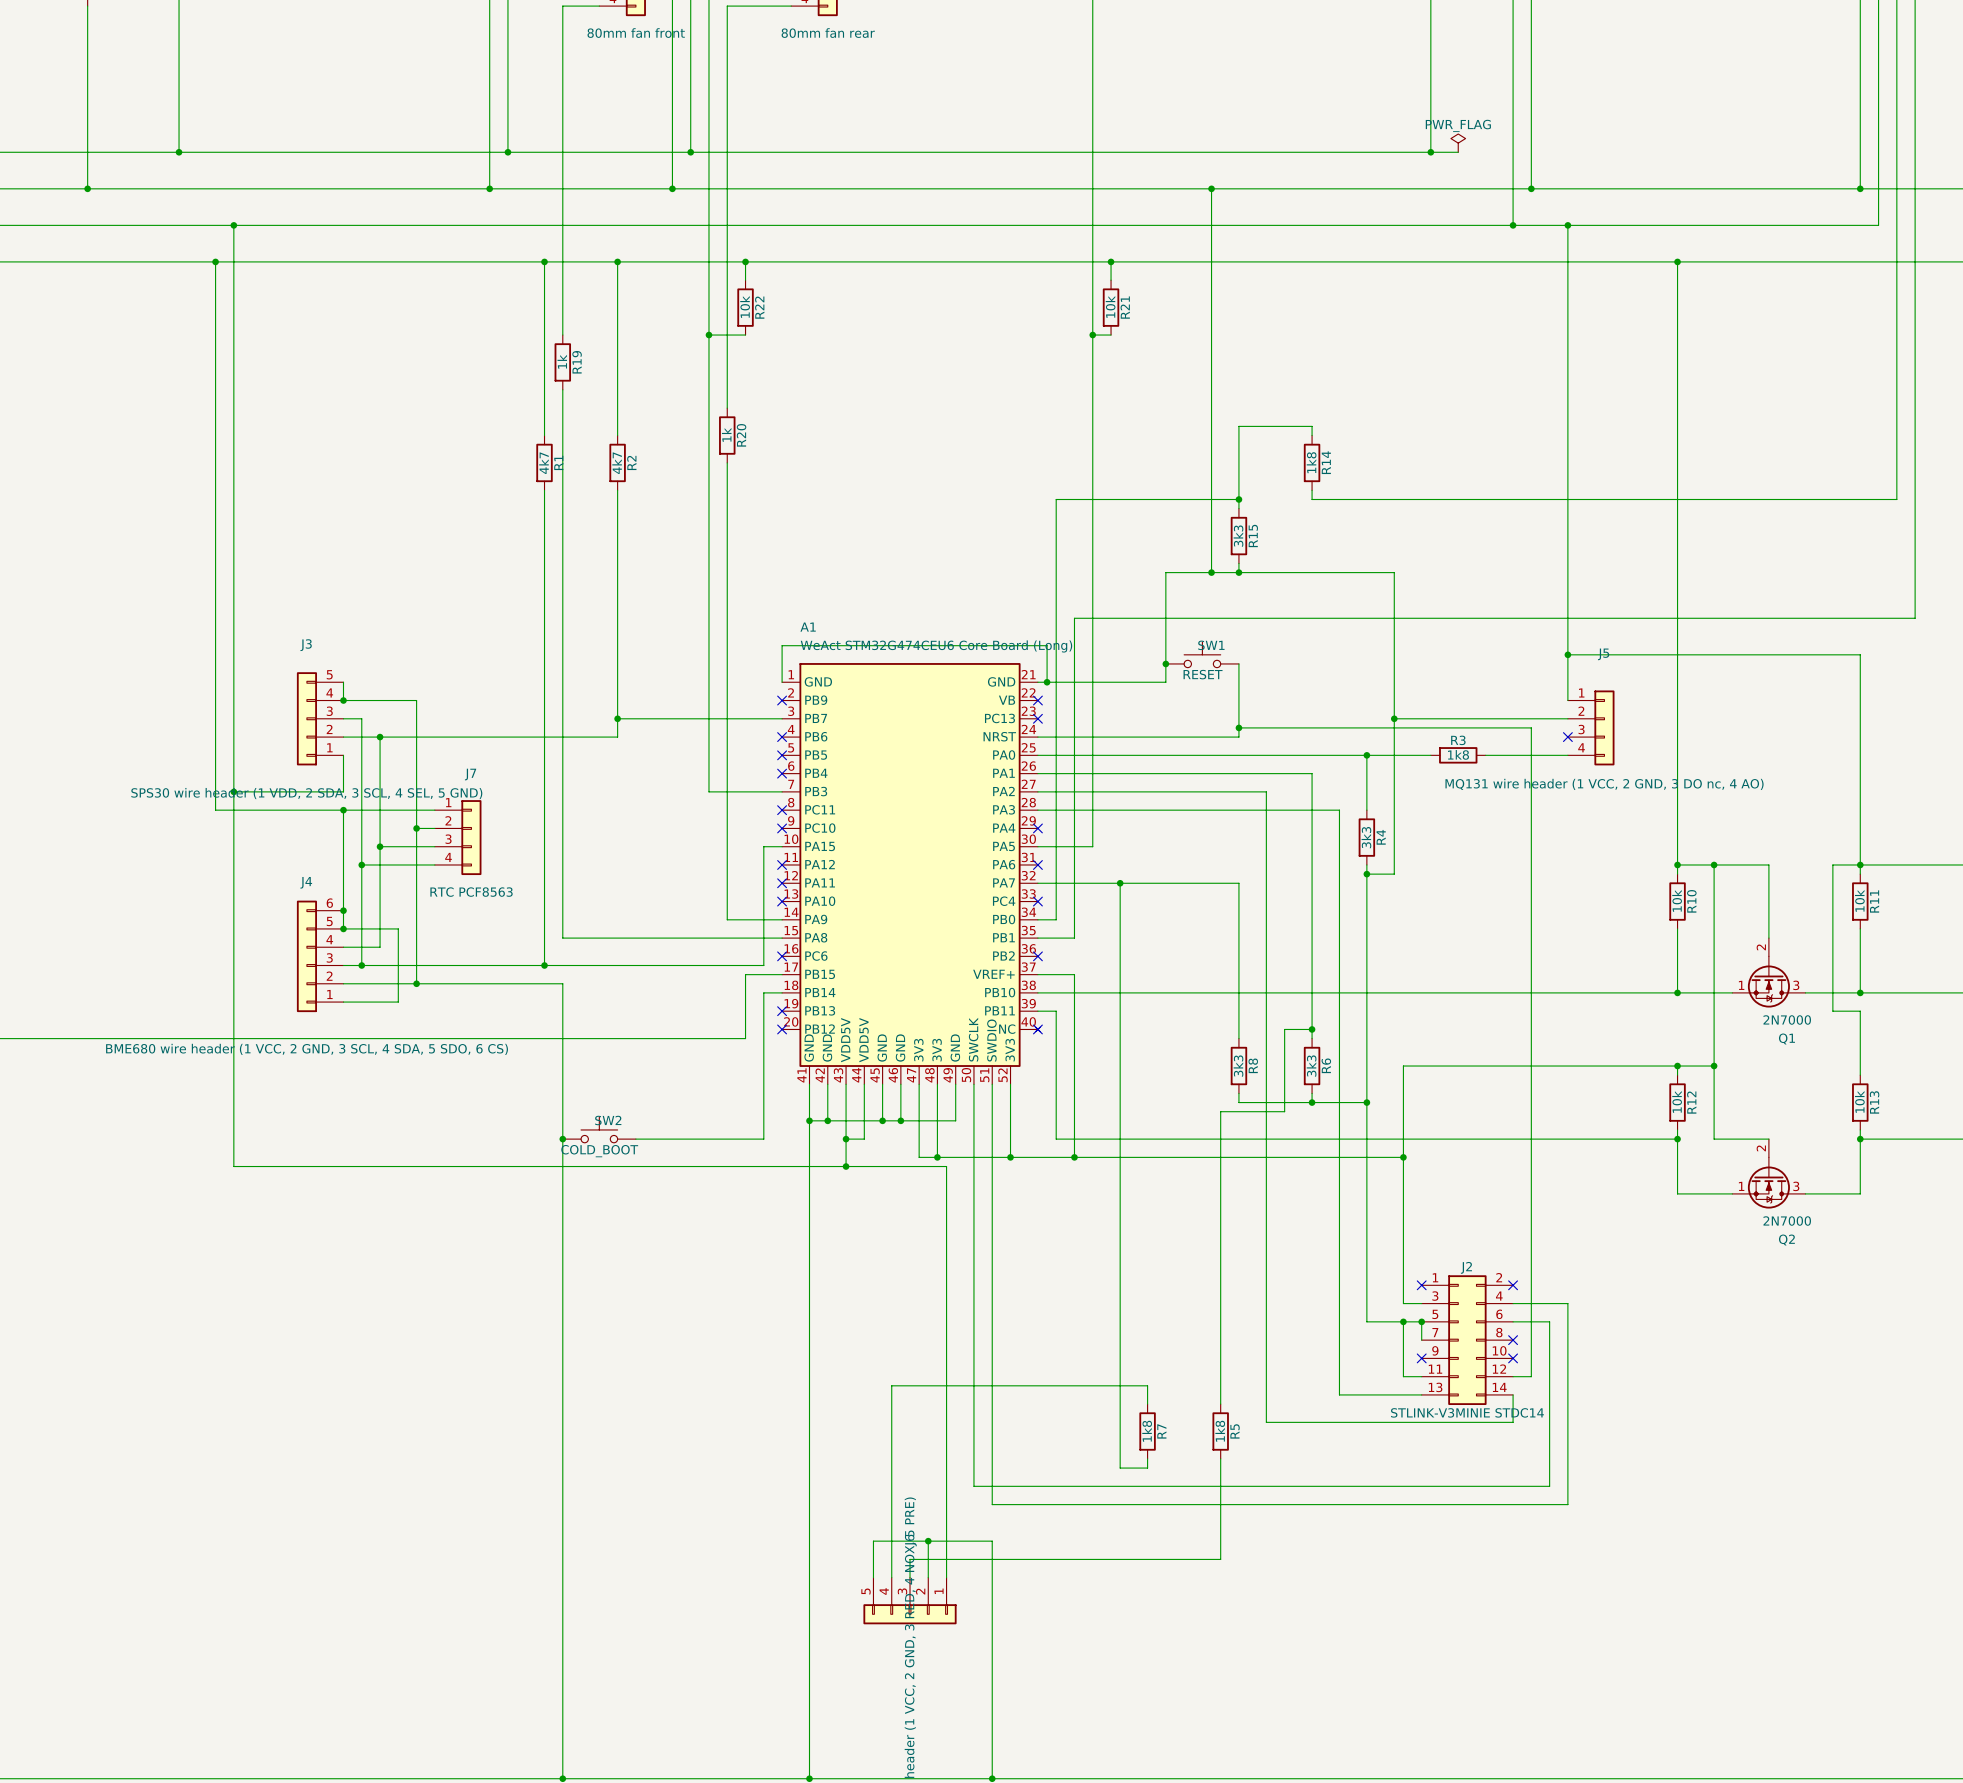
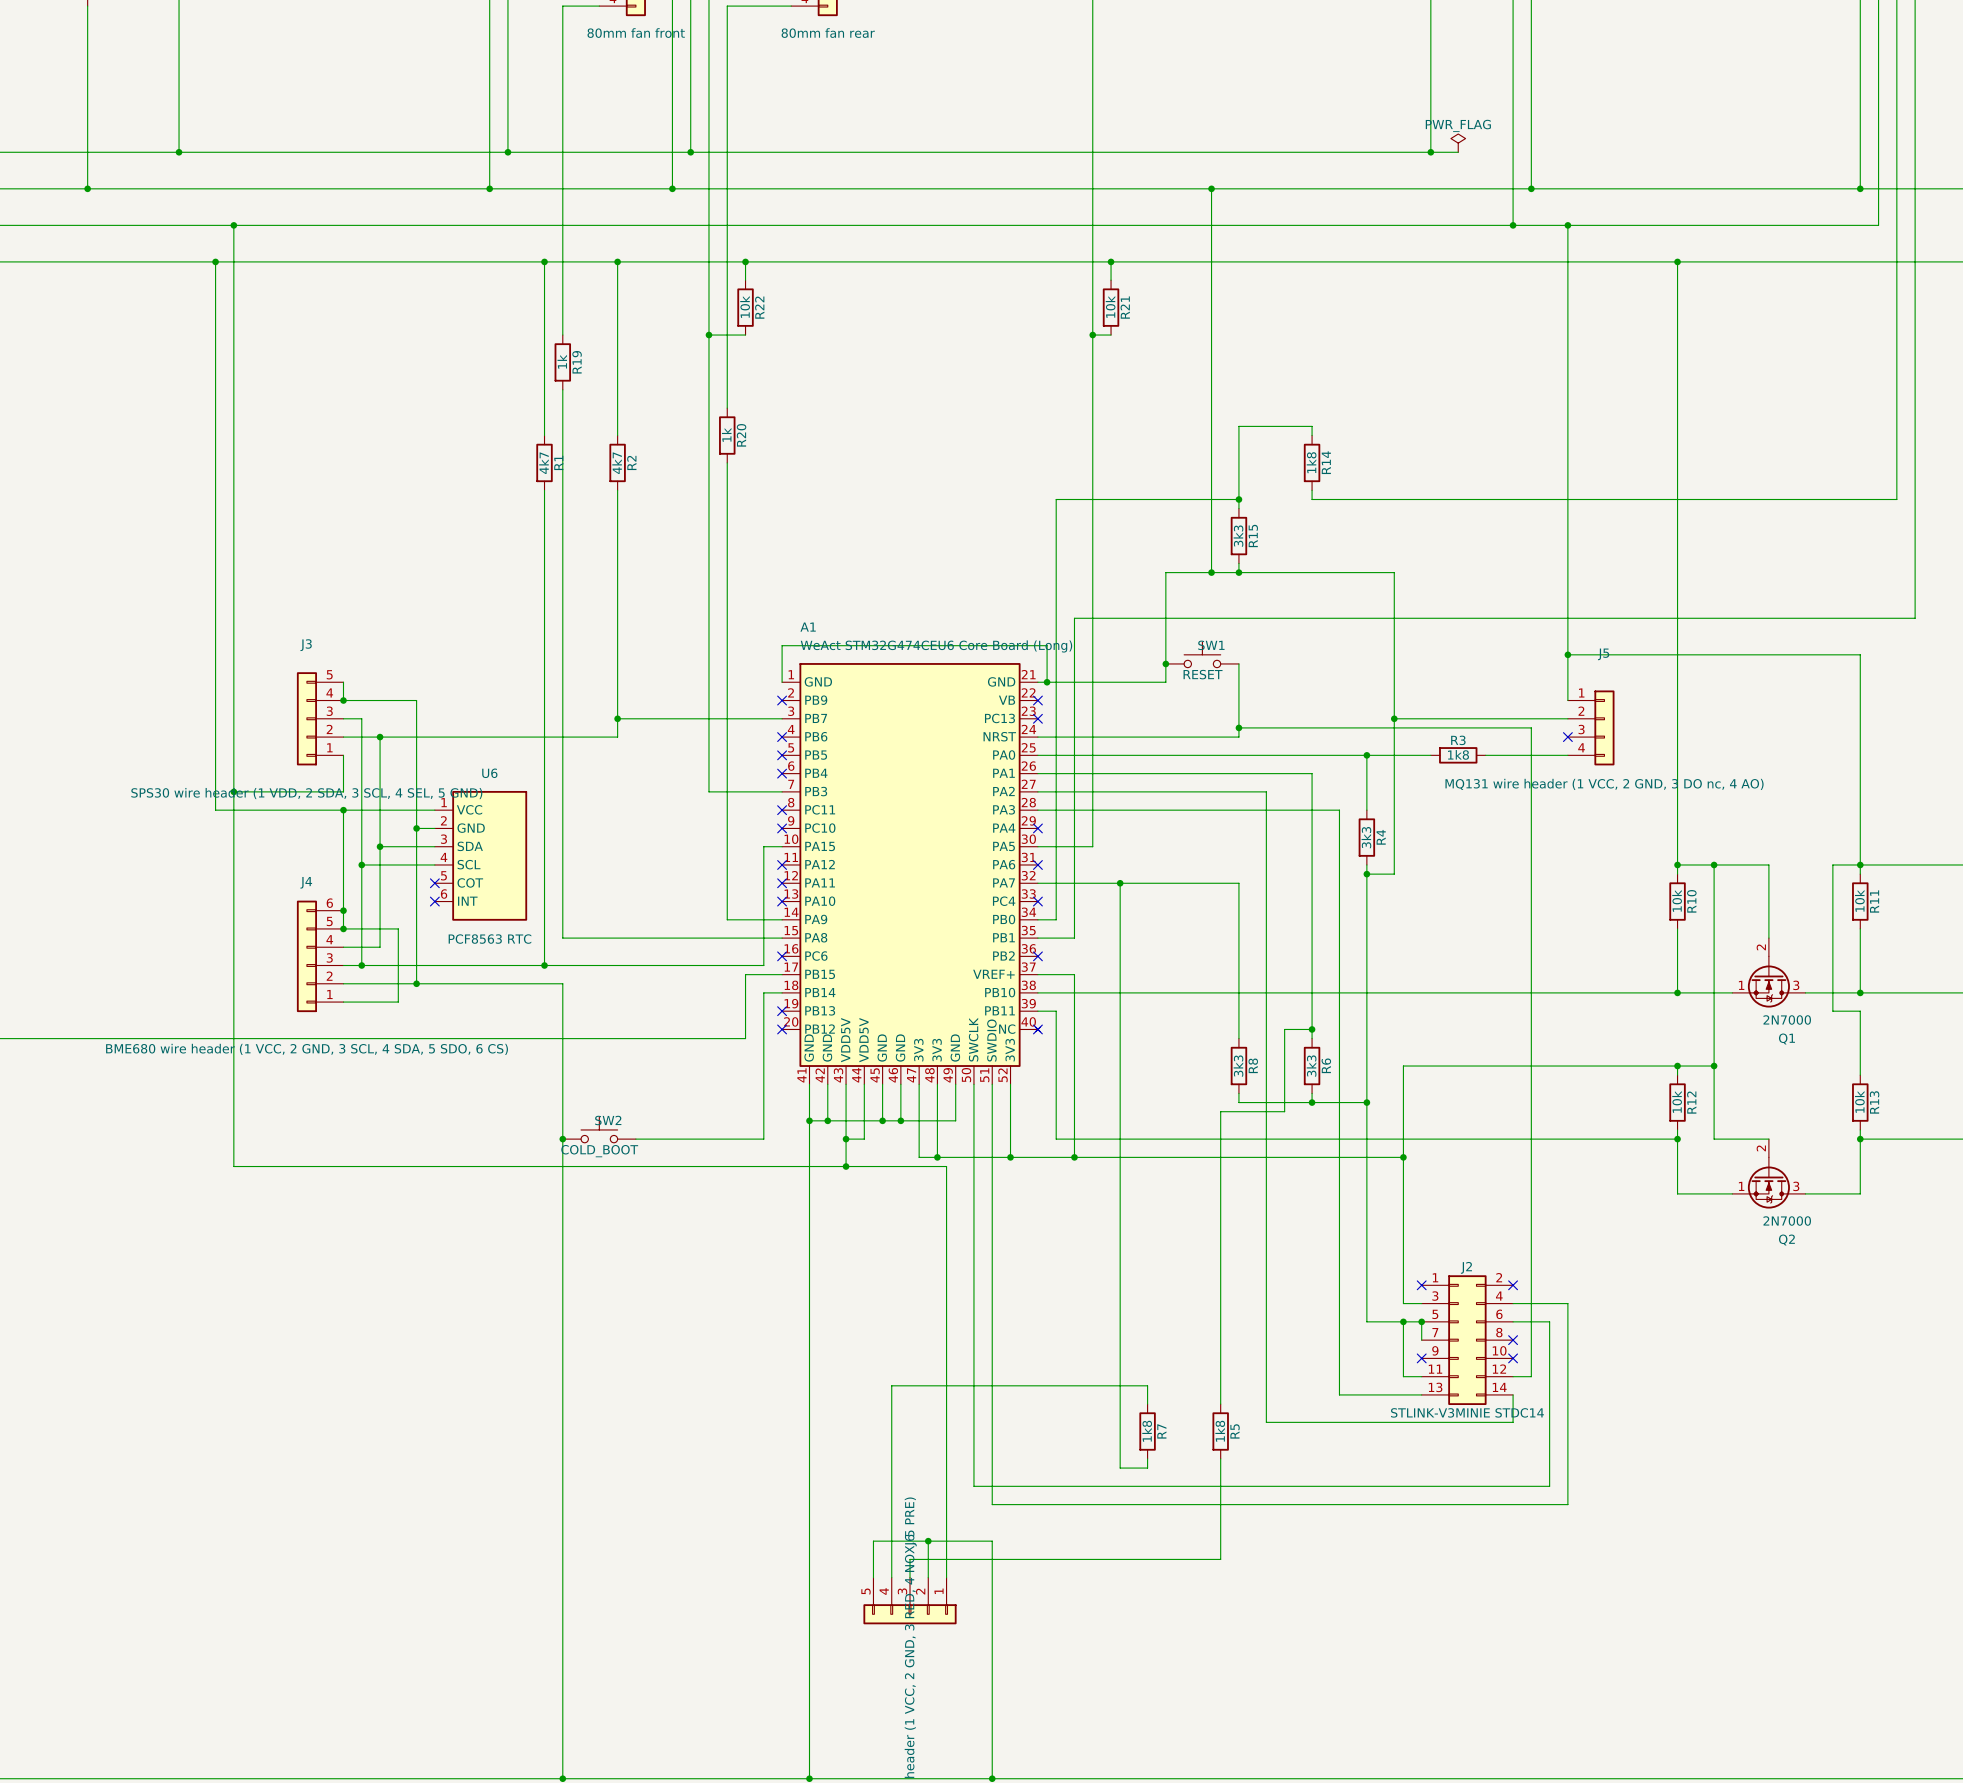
J7: RTC PCF8563 (458, 837) -> none
U6: none -> PCF8563 RTC (481, 855)
no-connect mark: none -> (434, 883)
no-connect mark: none -> (434, 901)

